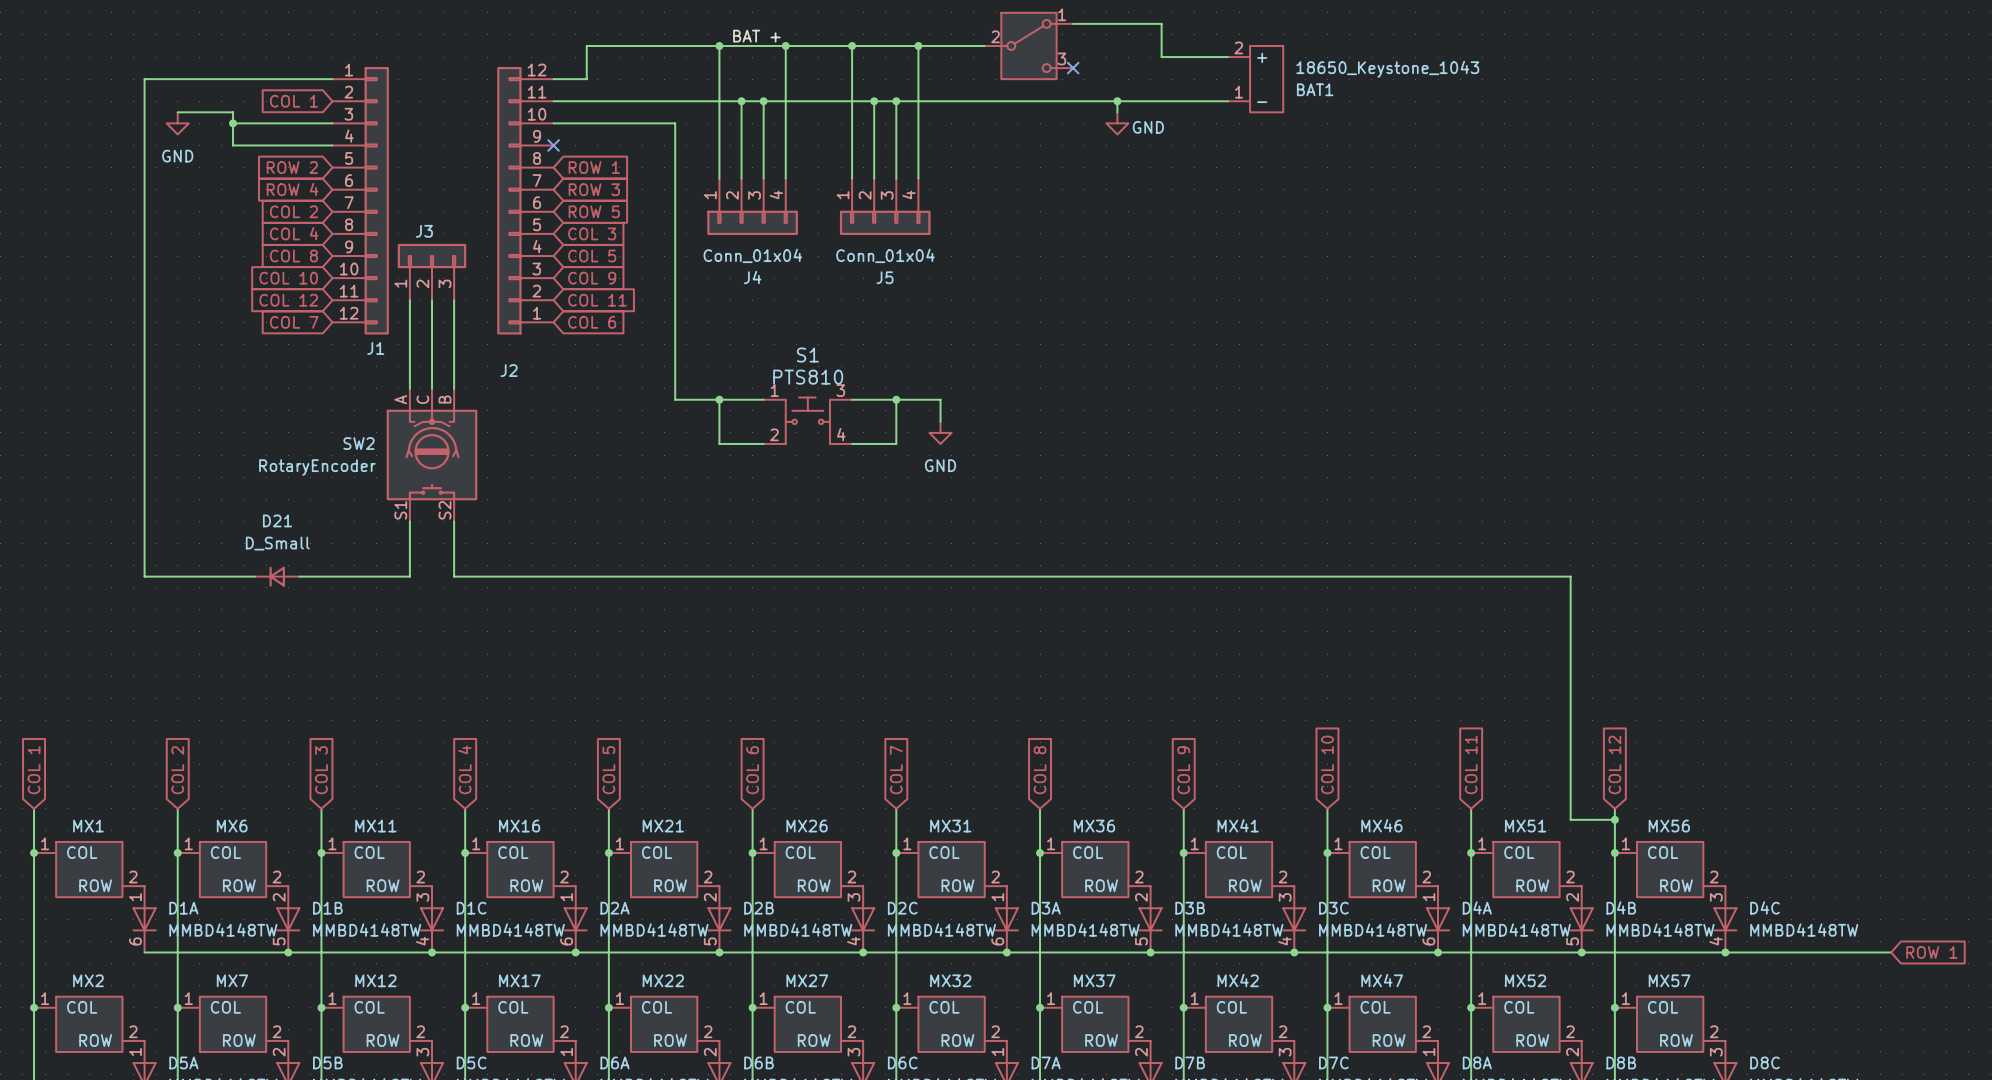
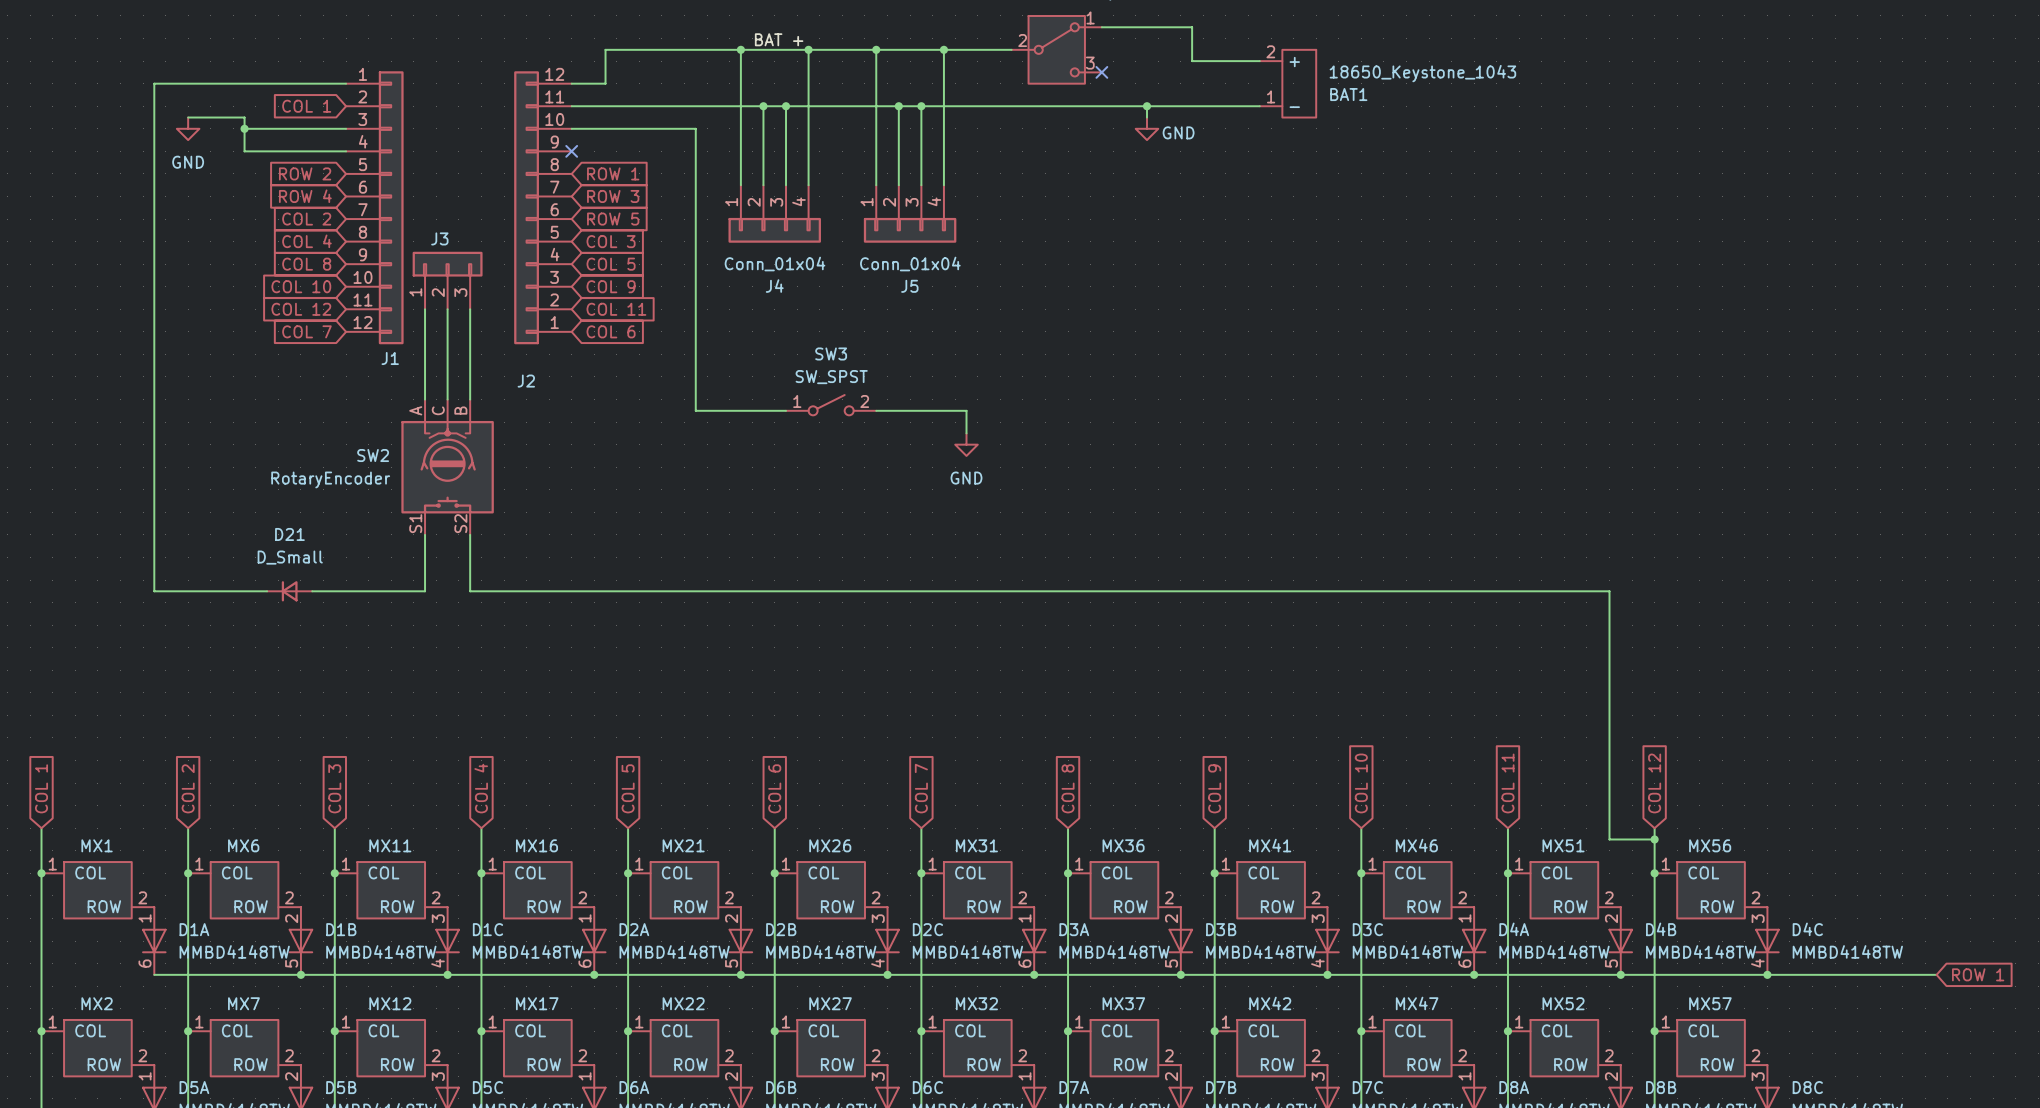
SW3: none -> SW_SPST (831, 405)
wire: (719, 399) (719, 443) (763, 443) -> none
junction: (719, 399) -> none
wire: (896, 399) (896, 443) (852, 443) -> none
junction: (896, 399) -> none
S1: PTS810 (807, 420) -> none

